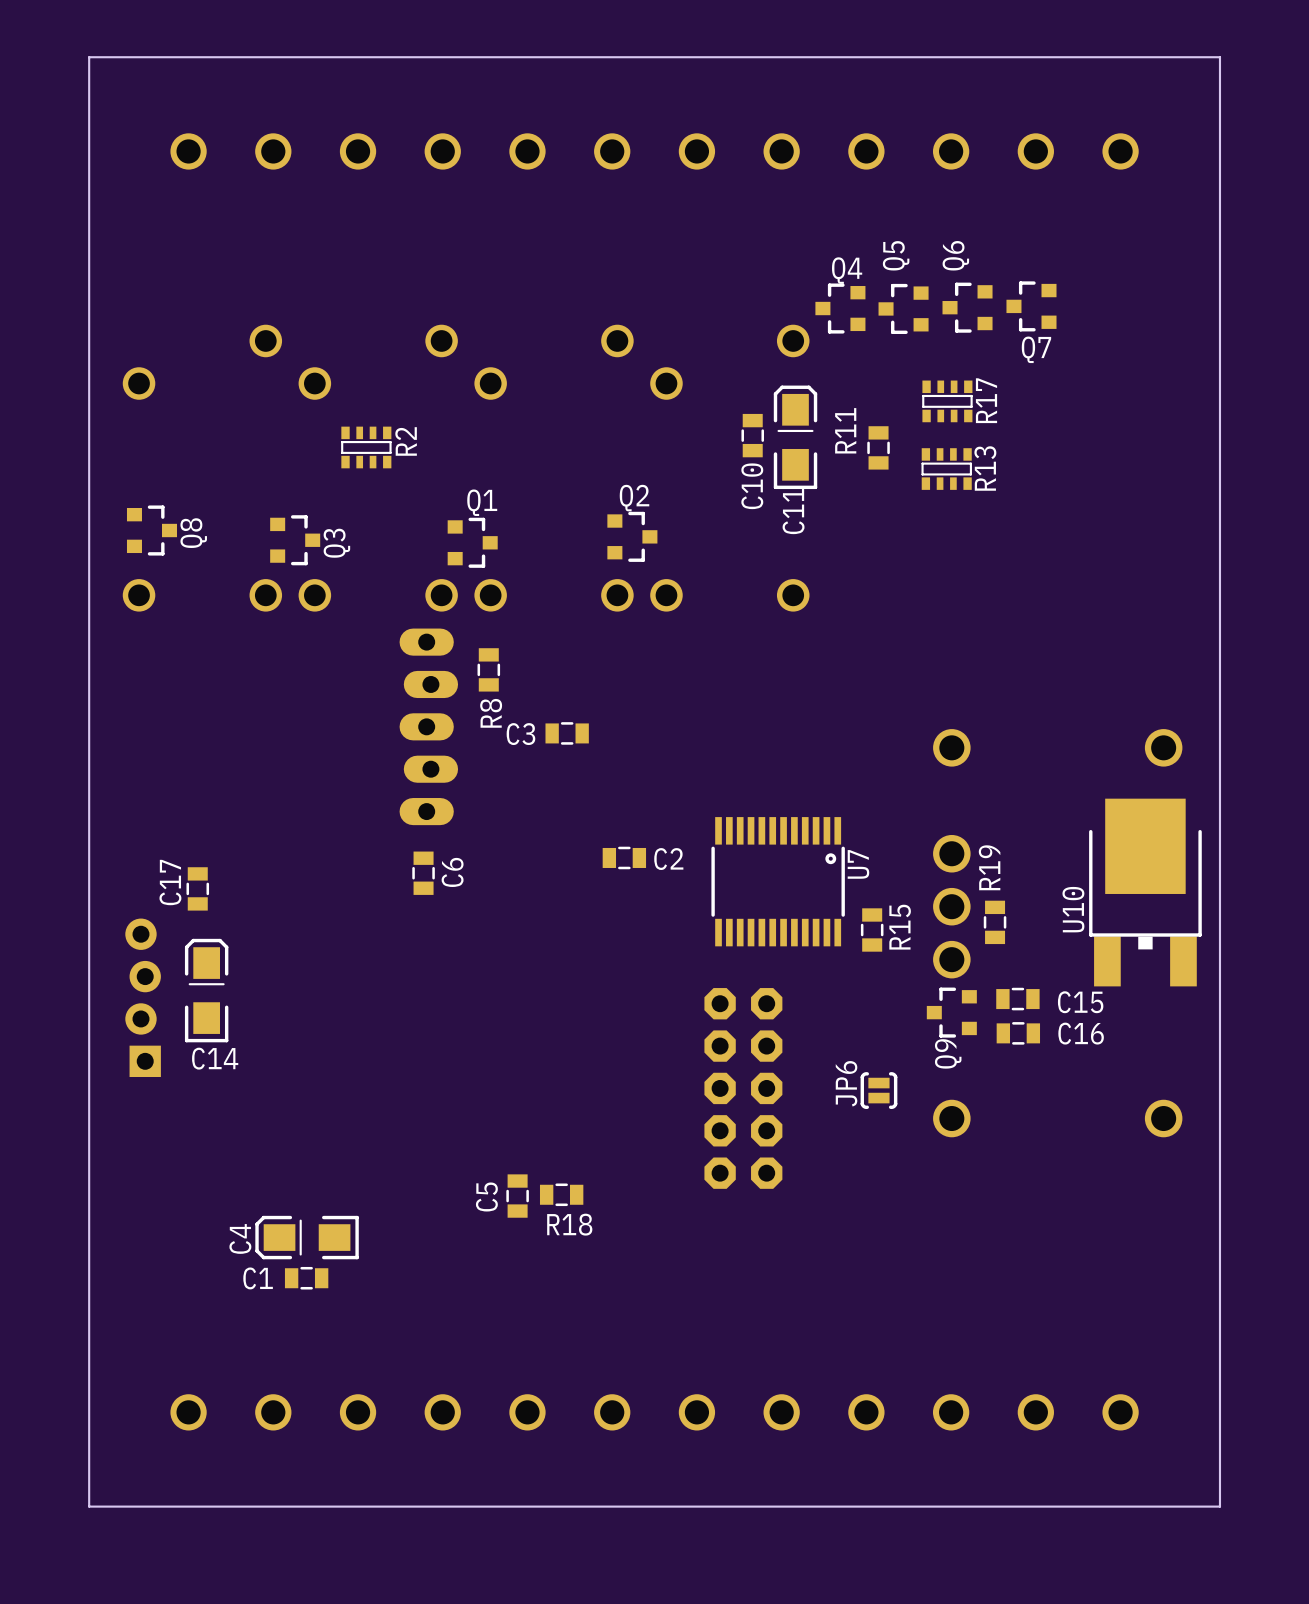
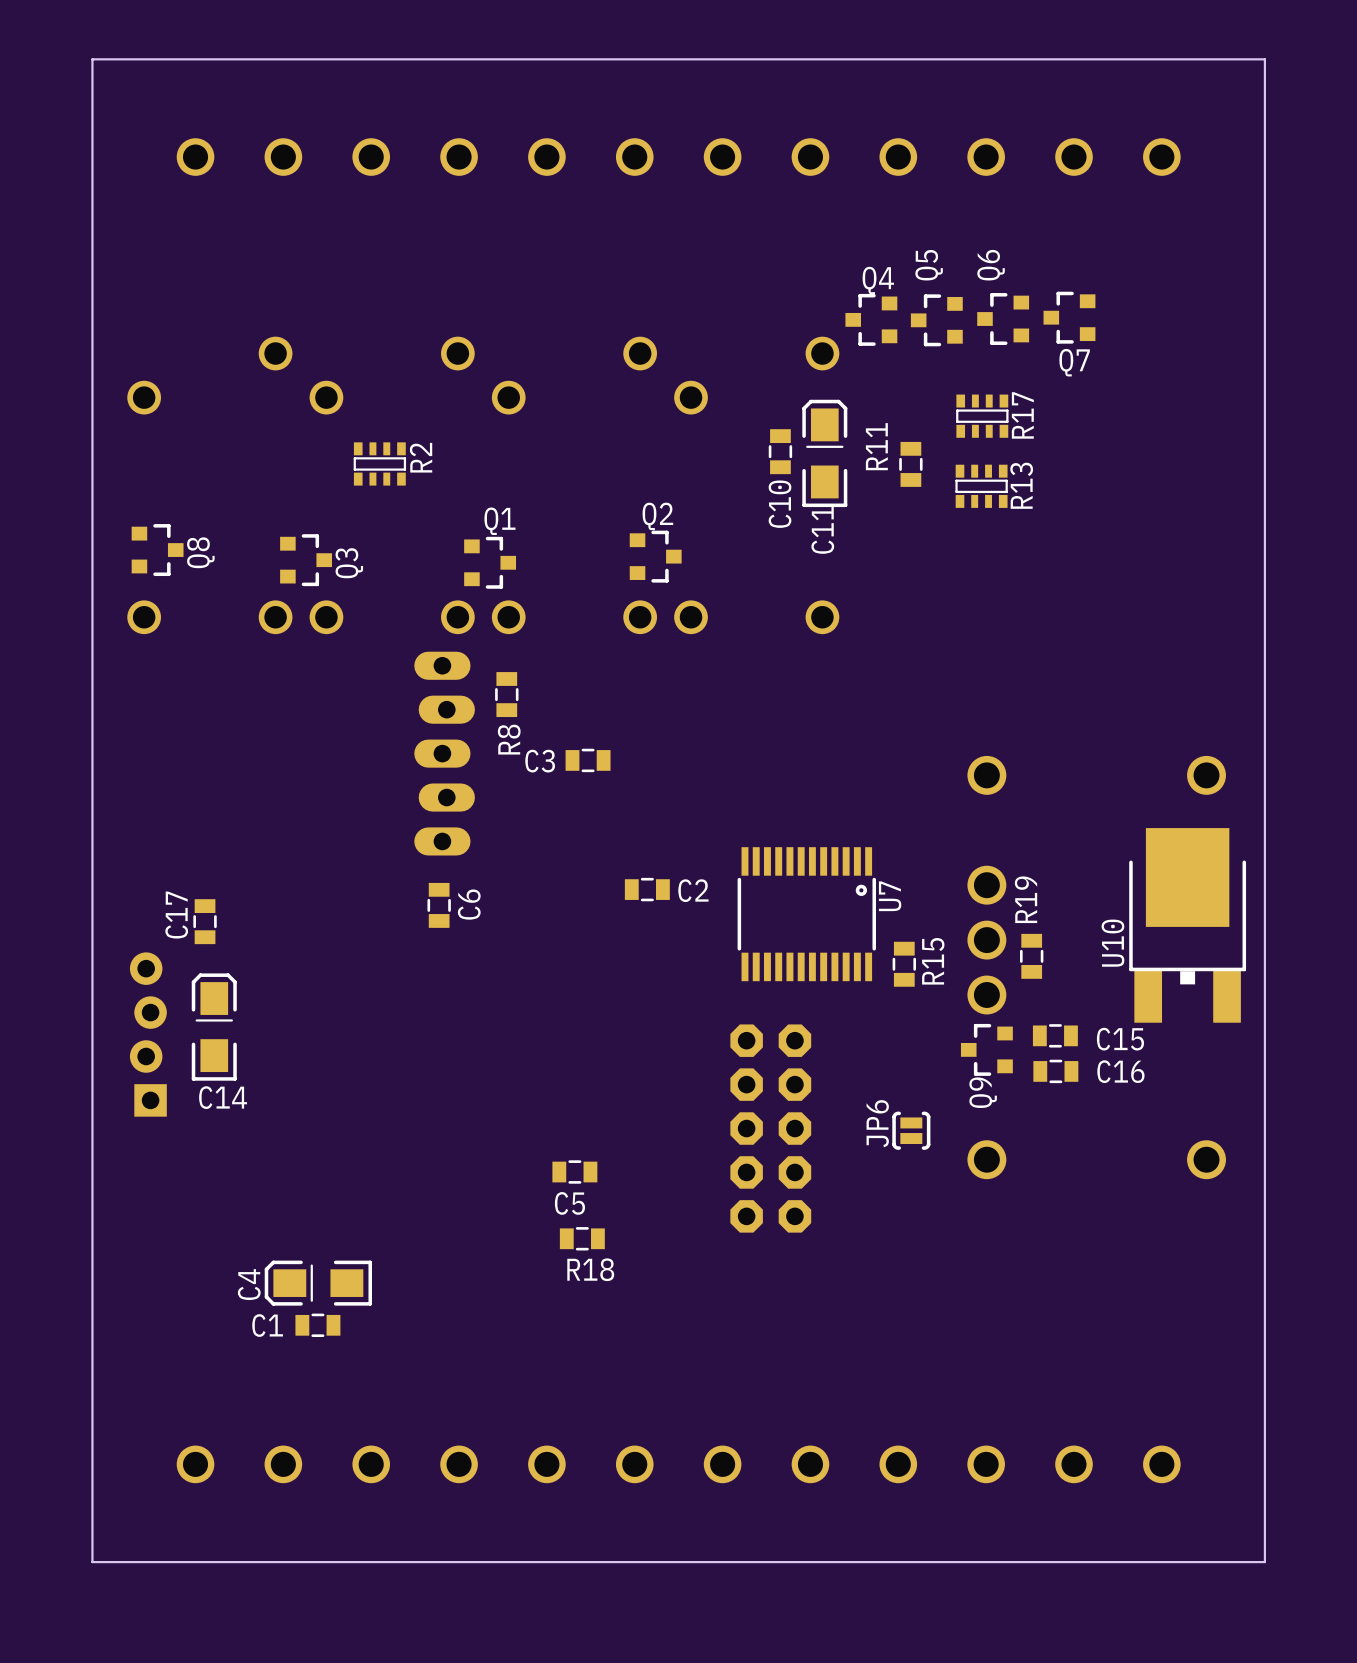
C5 name position: C5 (486, 1196) -> C5 (569, 1203)
C5 rotation: 0° (517, 1196) -> 90° clockwise (574, 1172)
C5 position: (517, 1196) -> (574, 1172)

